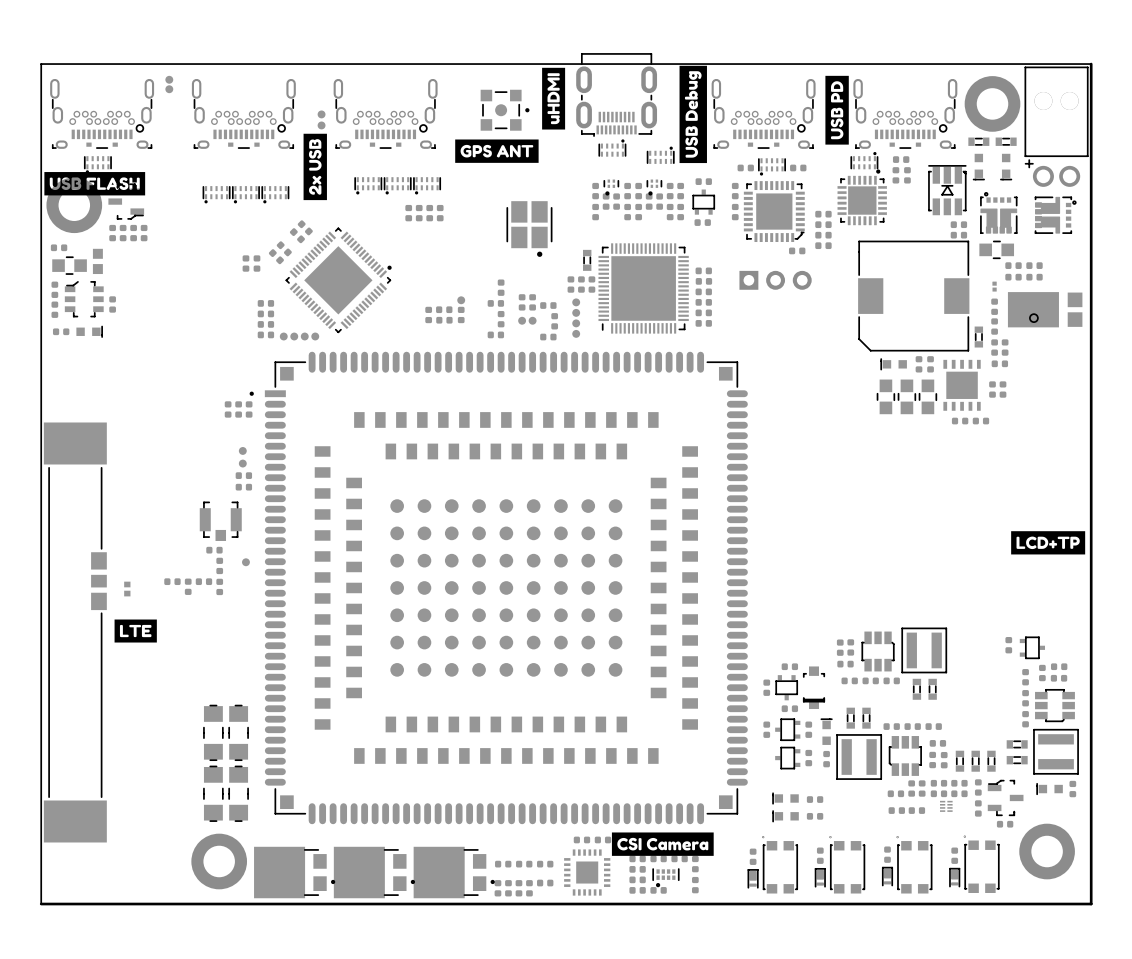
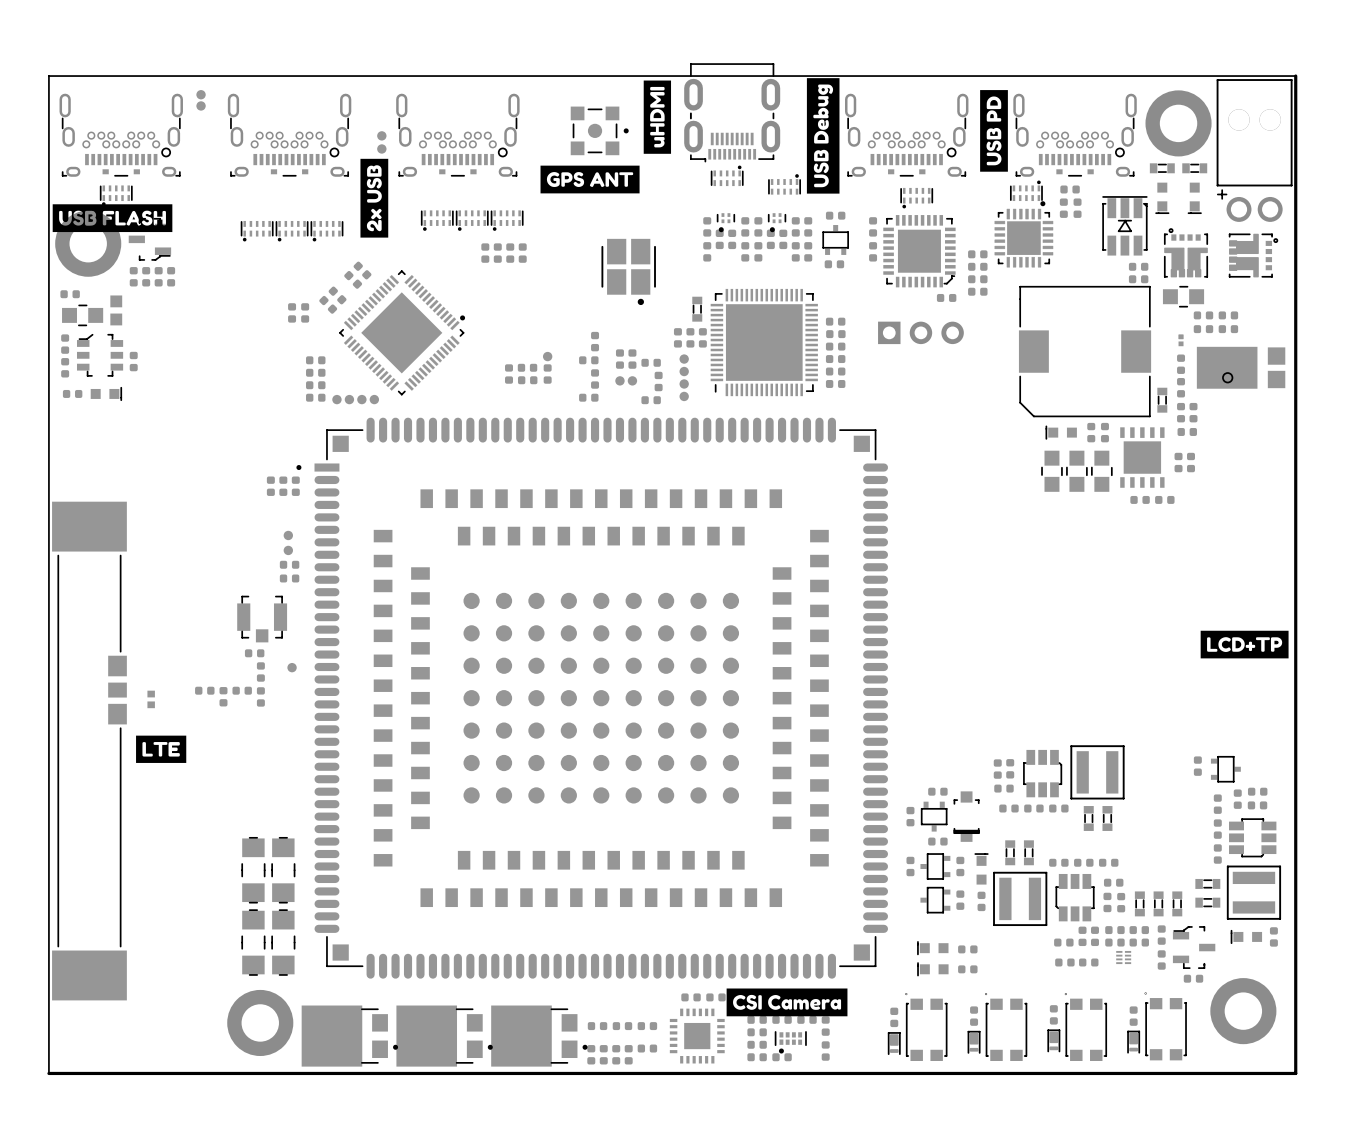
part: (745, 167) -> none
part: (798, 167) -> none

